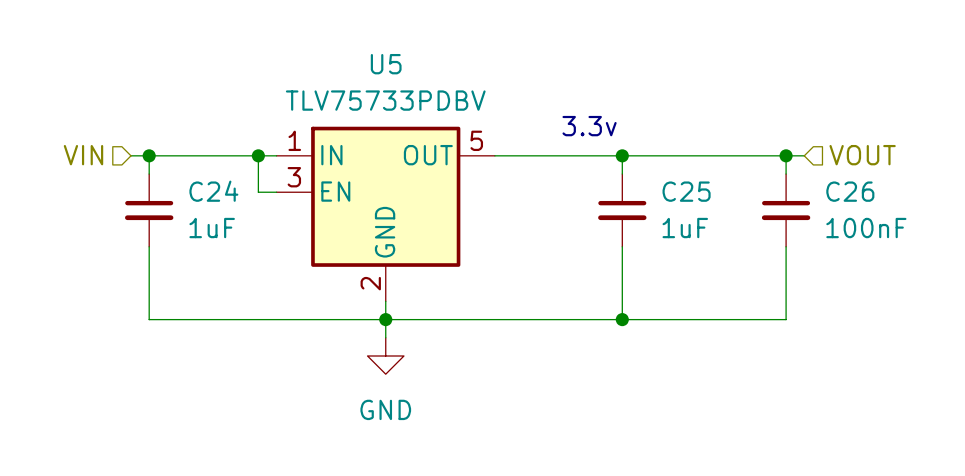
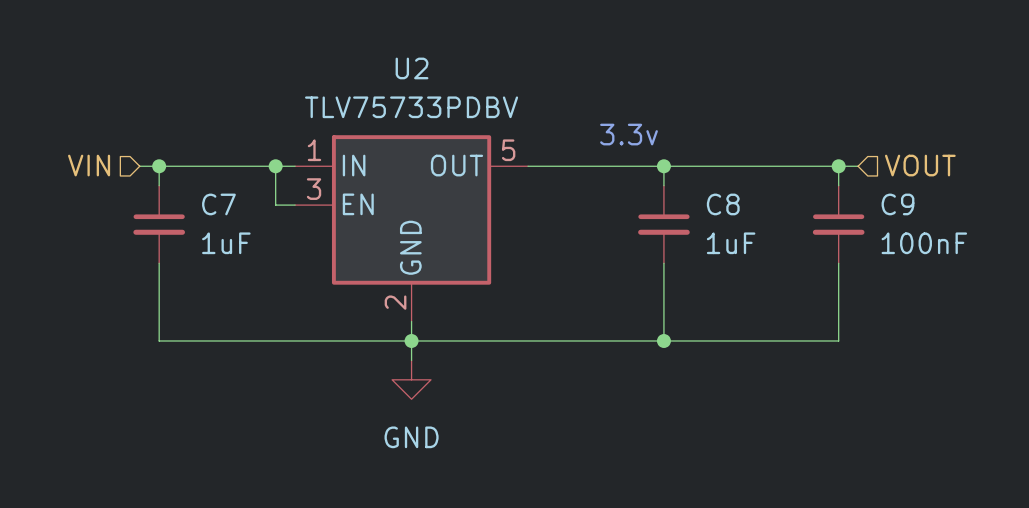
U5 name: U5 (386, 64) -> U2 (412, 68)
C24 name: C24 (213, 191) -> C7 (218, 204)
C25 name: C25 (686, 191) -> C8 (723, 204)
C26 name: C26 (850, 191) -> C9 (897, 204)

